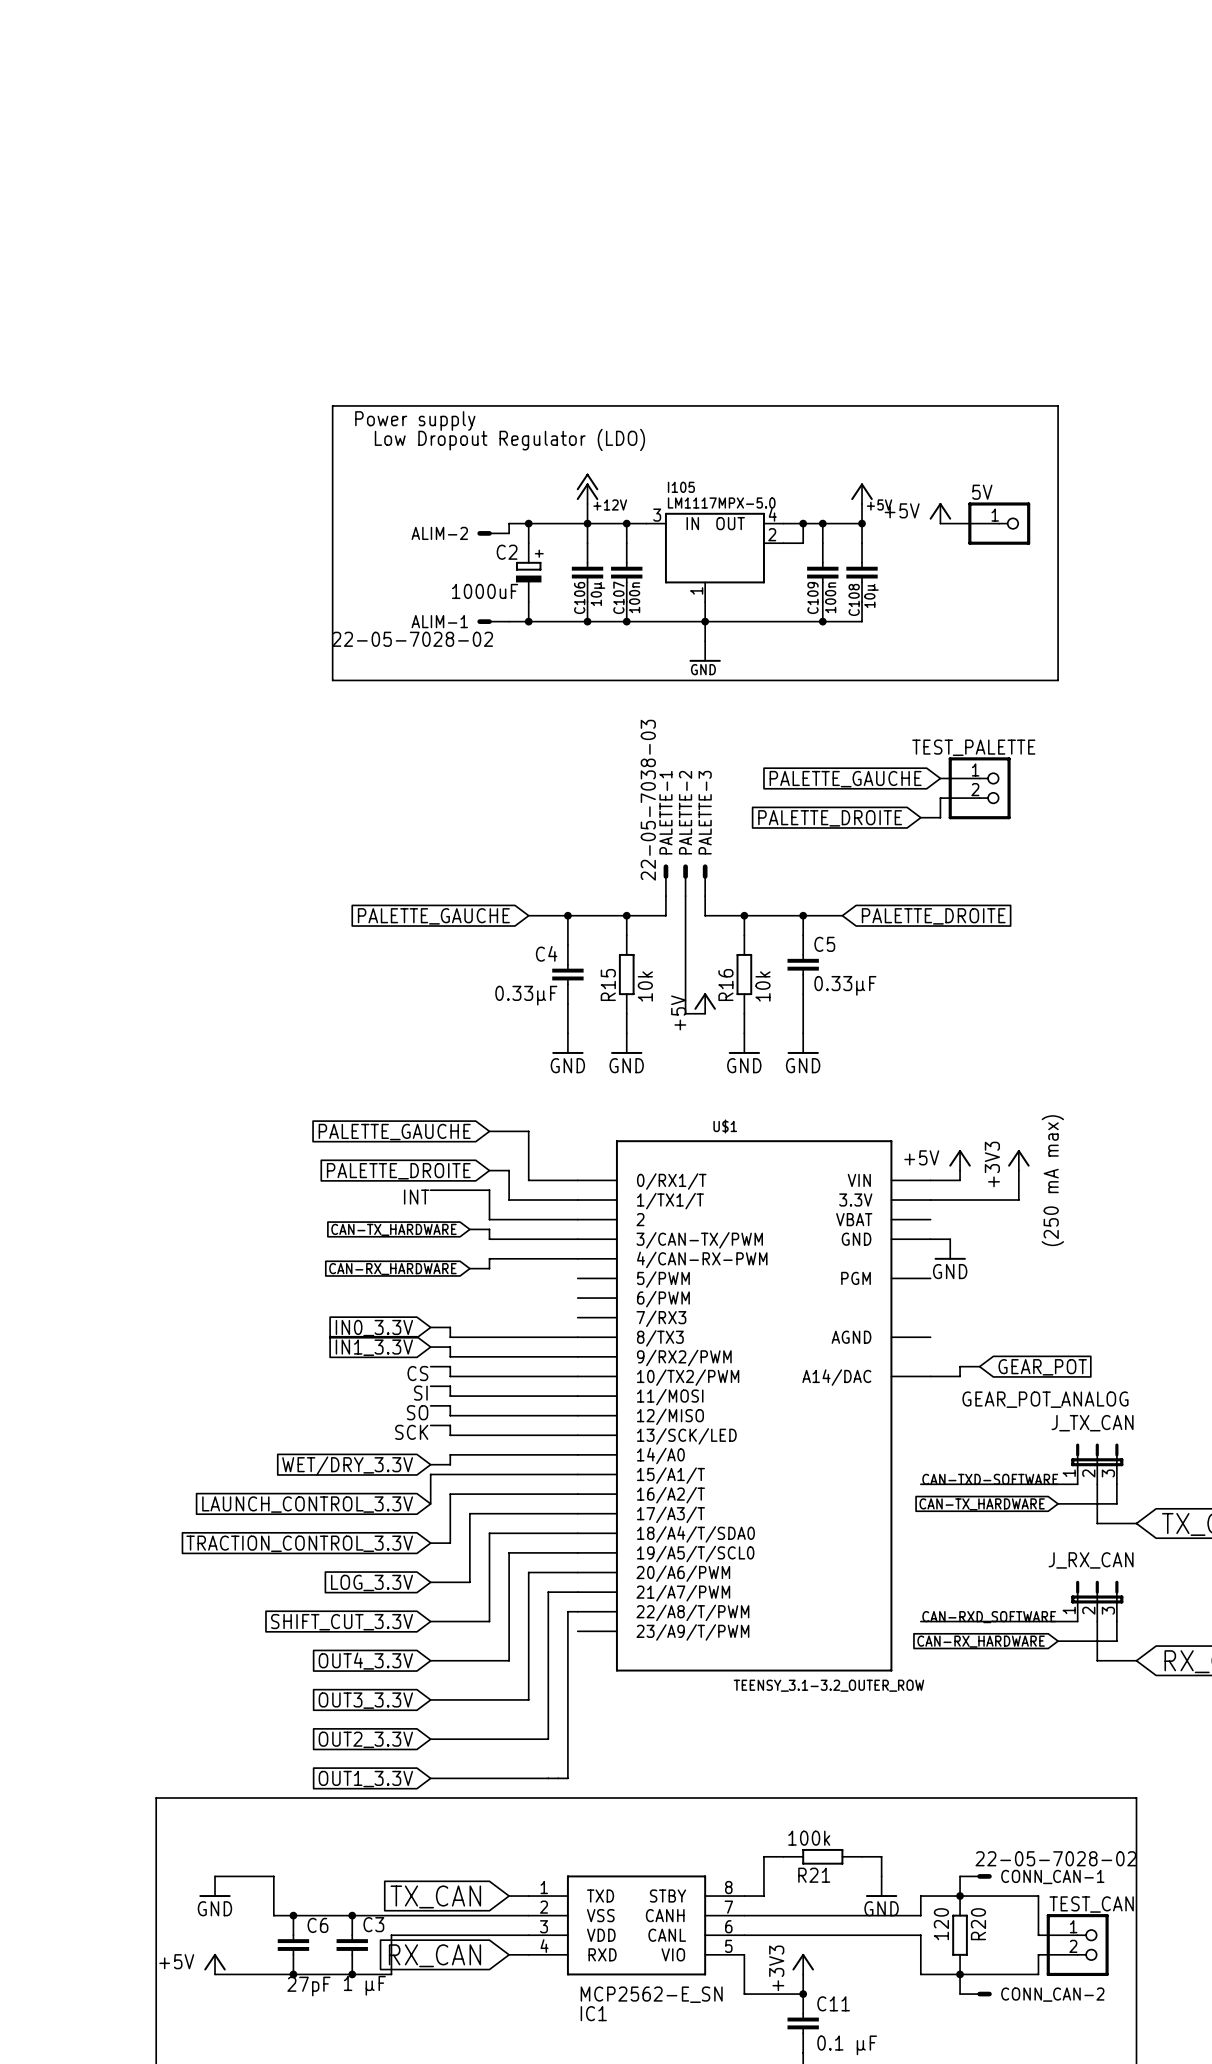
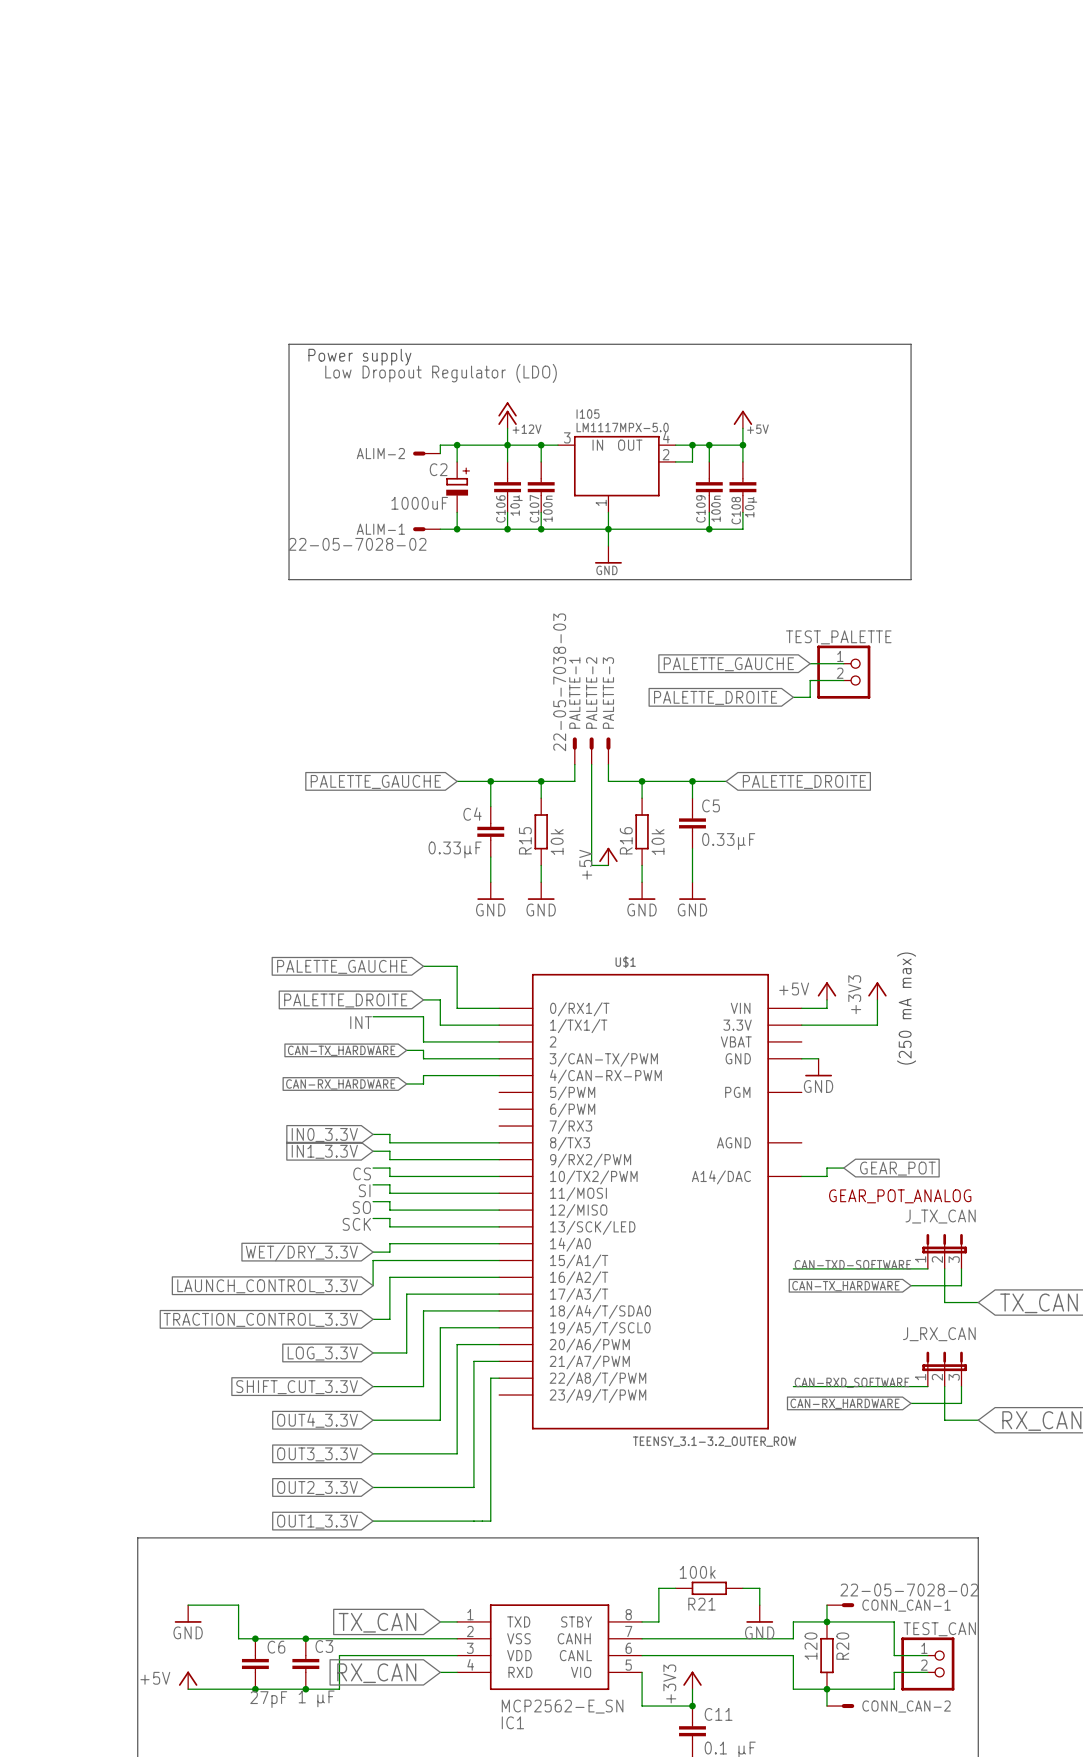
power symbol: +5V (940, 513) -> none
wire: (940, 523) (999, 523) -> none
5V: (999, 523) -> none

